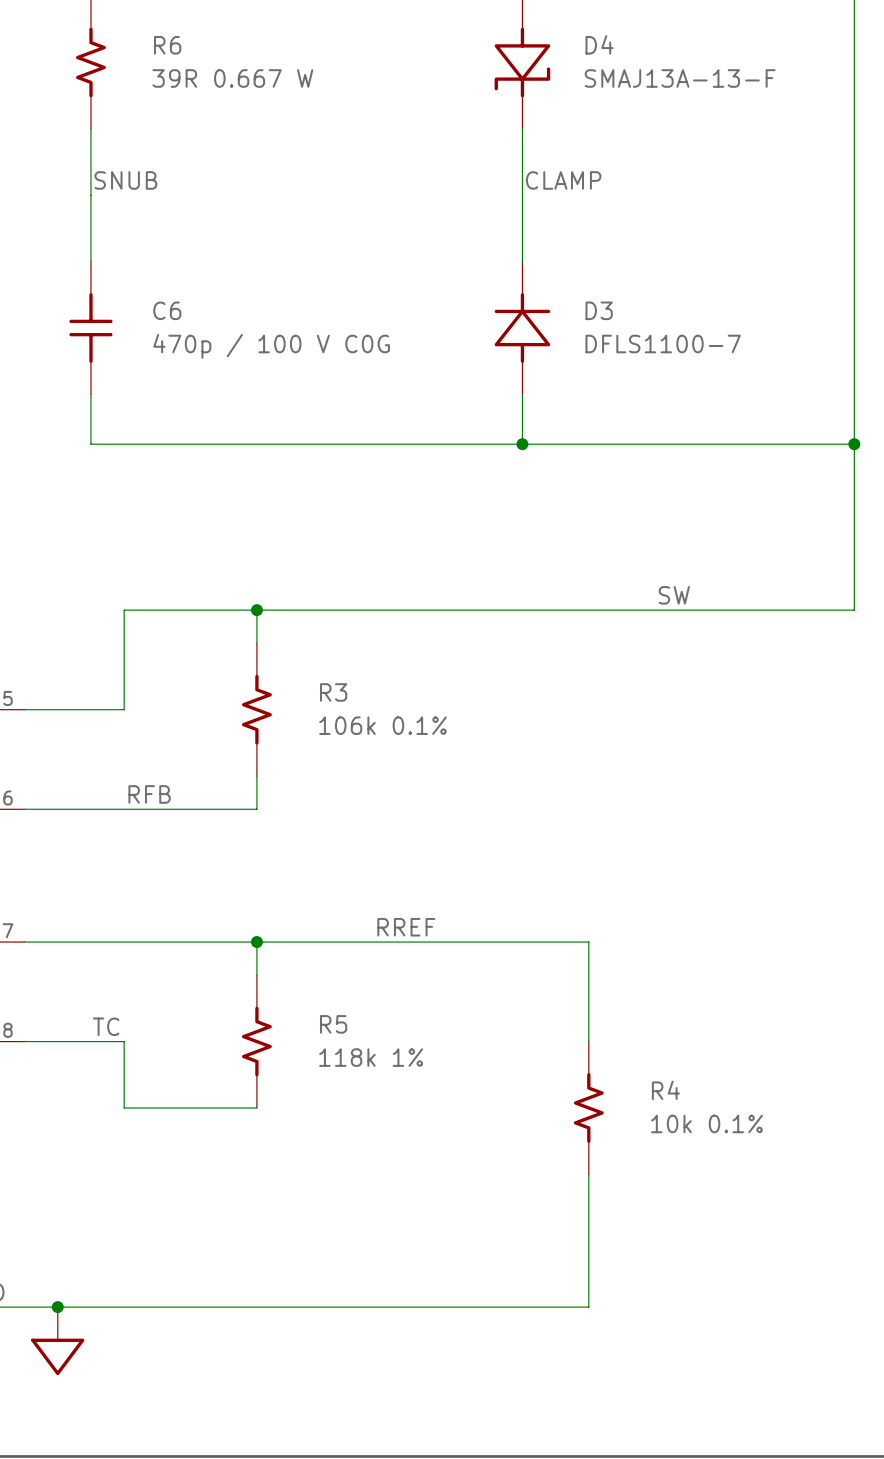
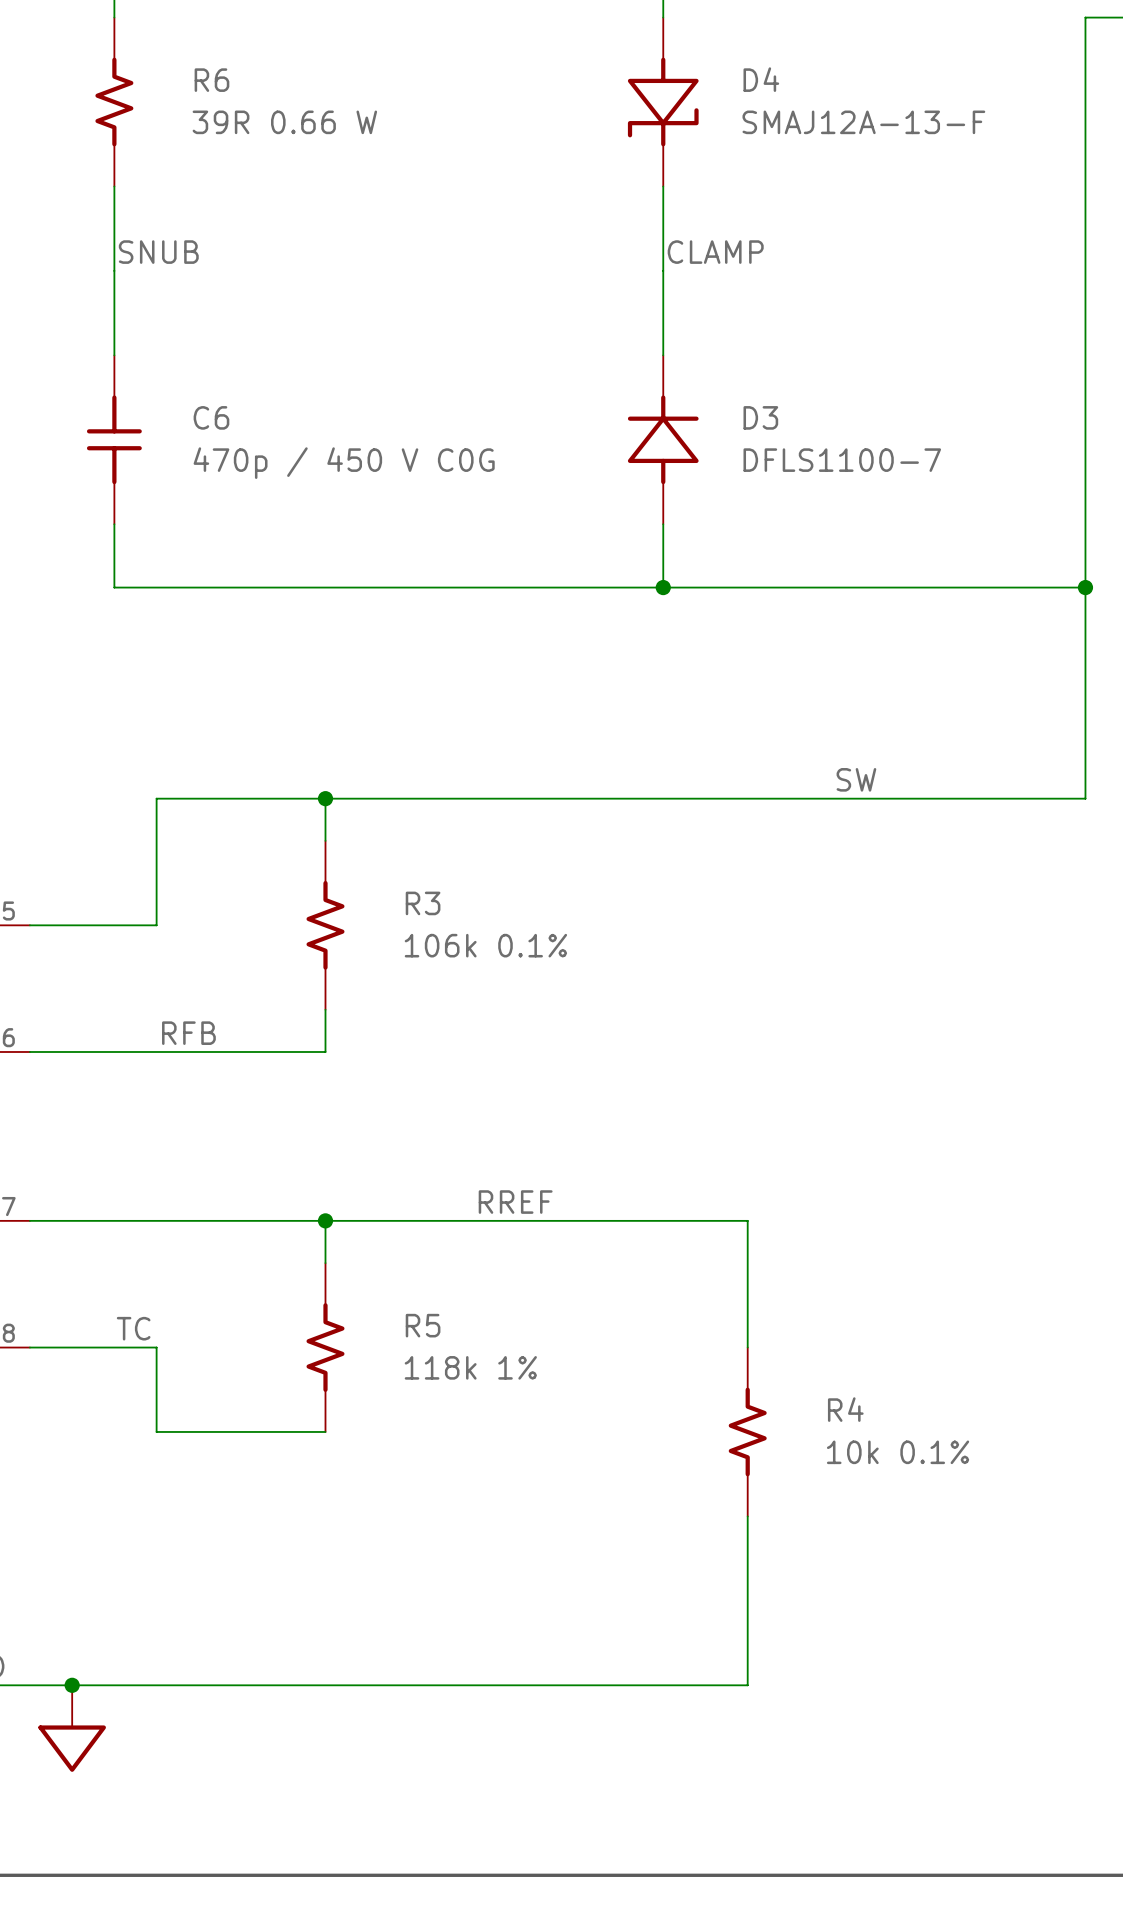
R6 value: 39R 0.667 W (232, 78) -> 39R 0.66 W (284, 122)
D4 value: SMAJ13A-13-F (680, 78) -> SMAJ12A-13-F (863, 122)
C6 value: 470p / 100 V C0G (271, 346) -> 470p / 450 V C0G (344, 463)

